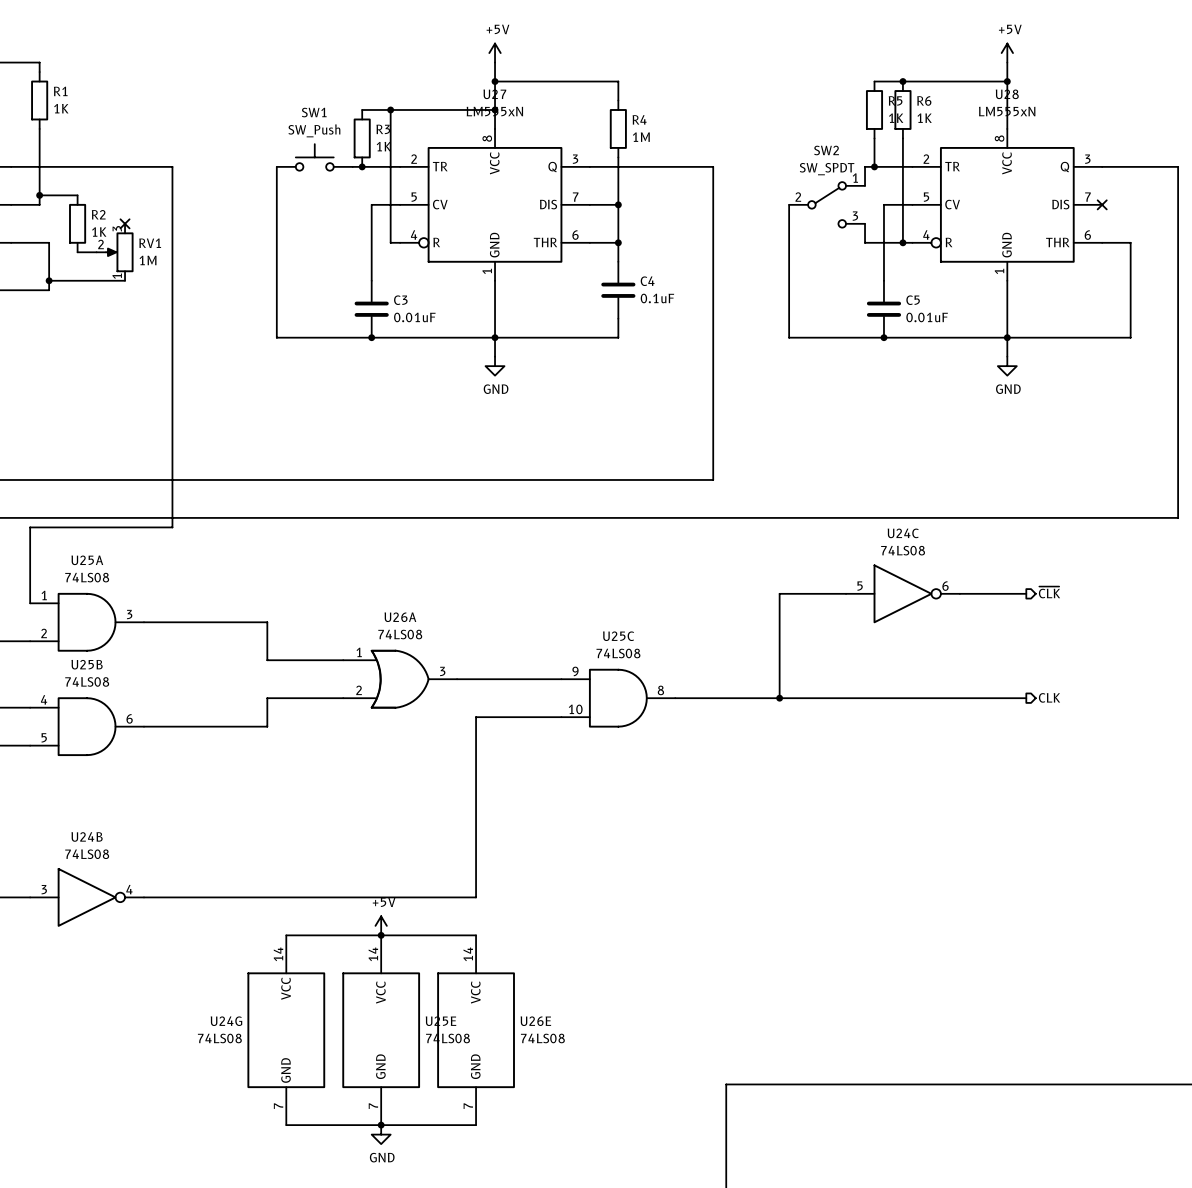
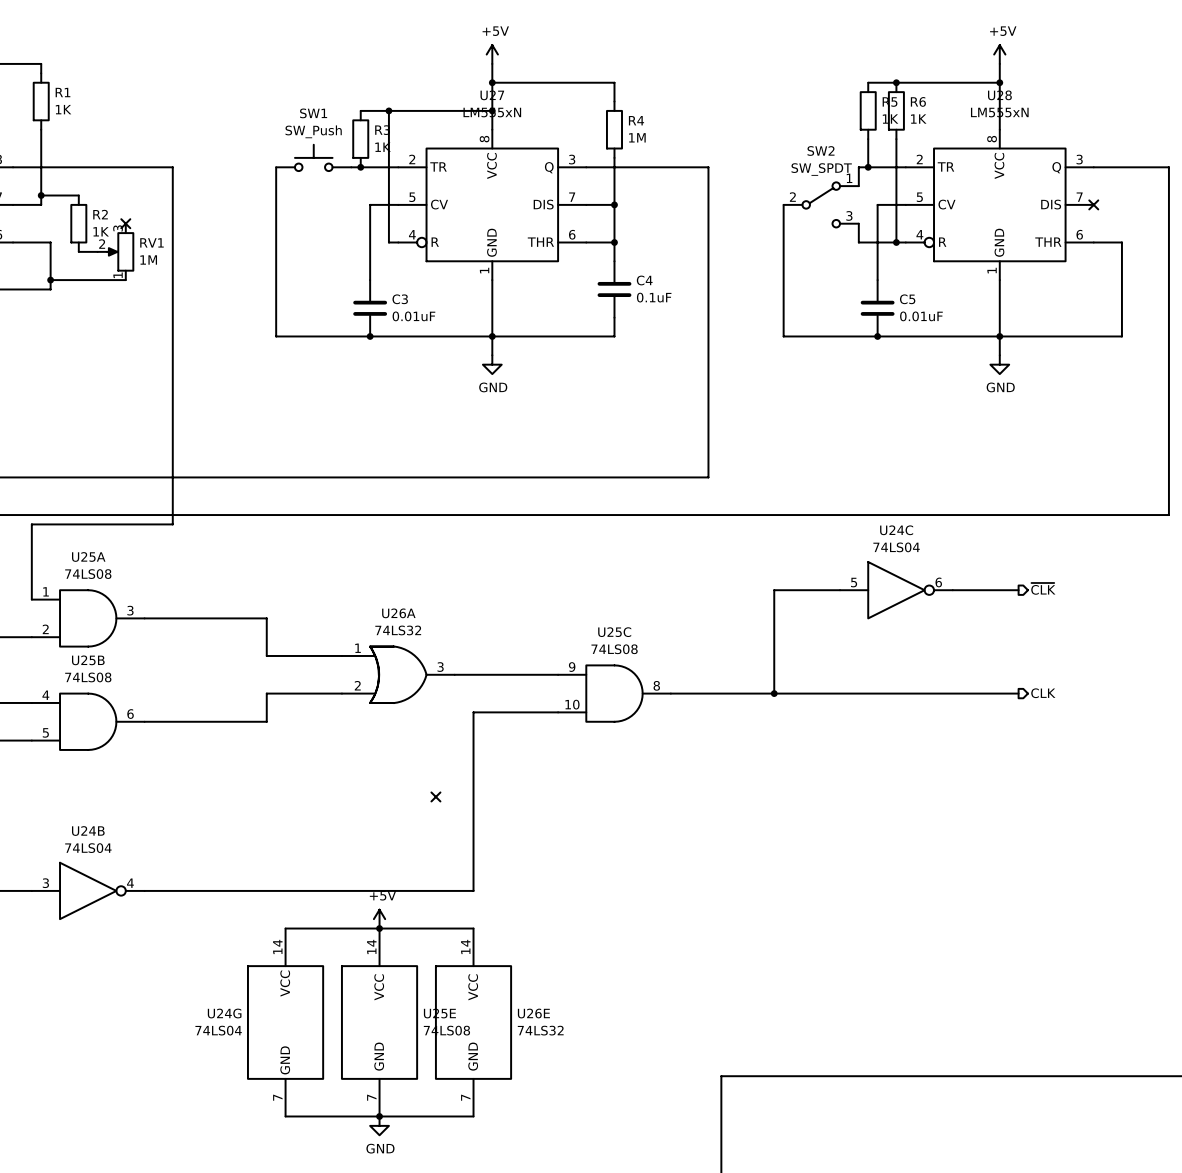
U24C value: 74LS08 (903, 550) -> 74LS04 (896, 547)
U26A value: 74LS08 (400, 634) -> 74LS32 (398, 630)
no-connect mark: none -> (435, 796)
U24B value: 74LS08 (87, 854) -> 74LS04 (88, 848)
U24G value: 74LS08 (219, 1038) -> 74LS04 (218, 1030)
U26E value: 74LS08 (542, 1038) -> 74LS32 (540, 1030)

